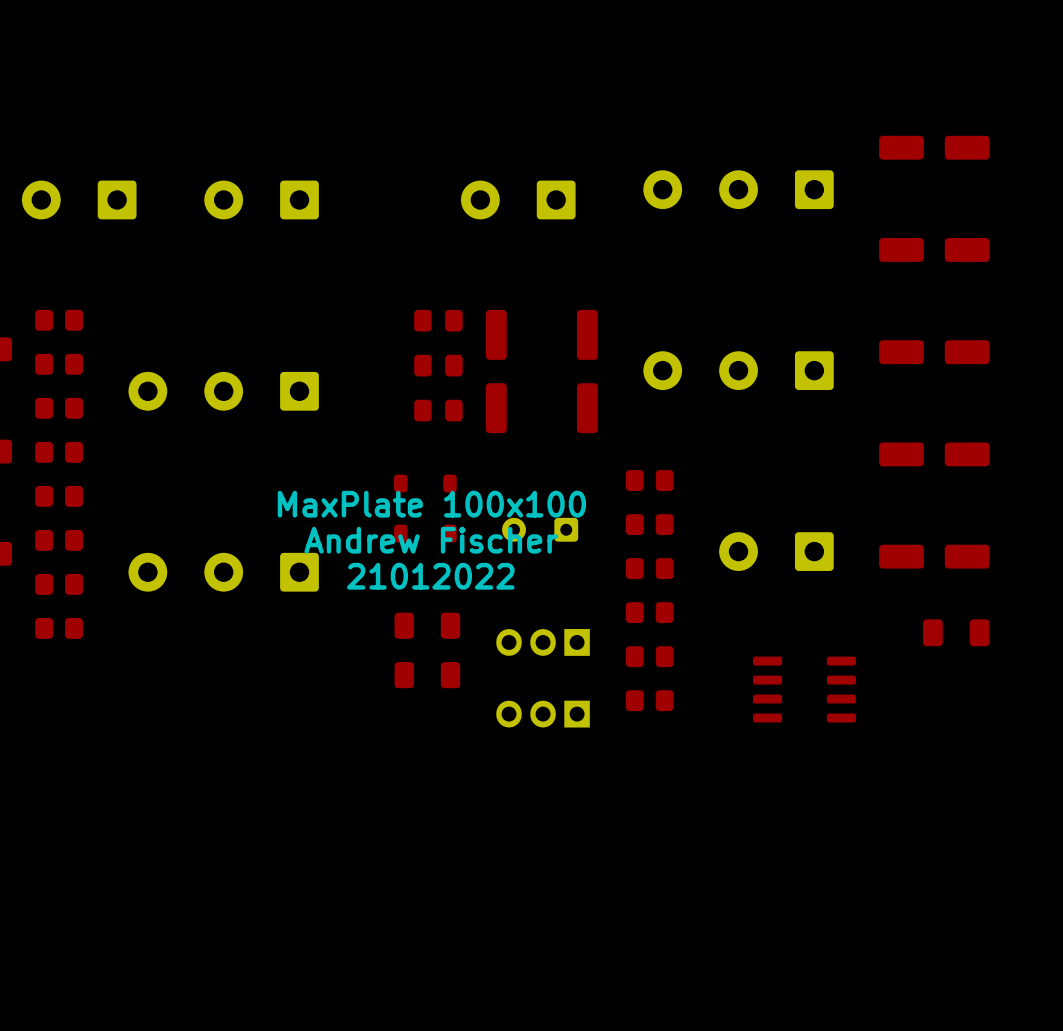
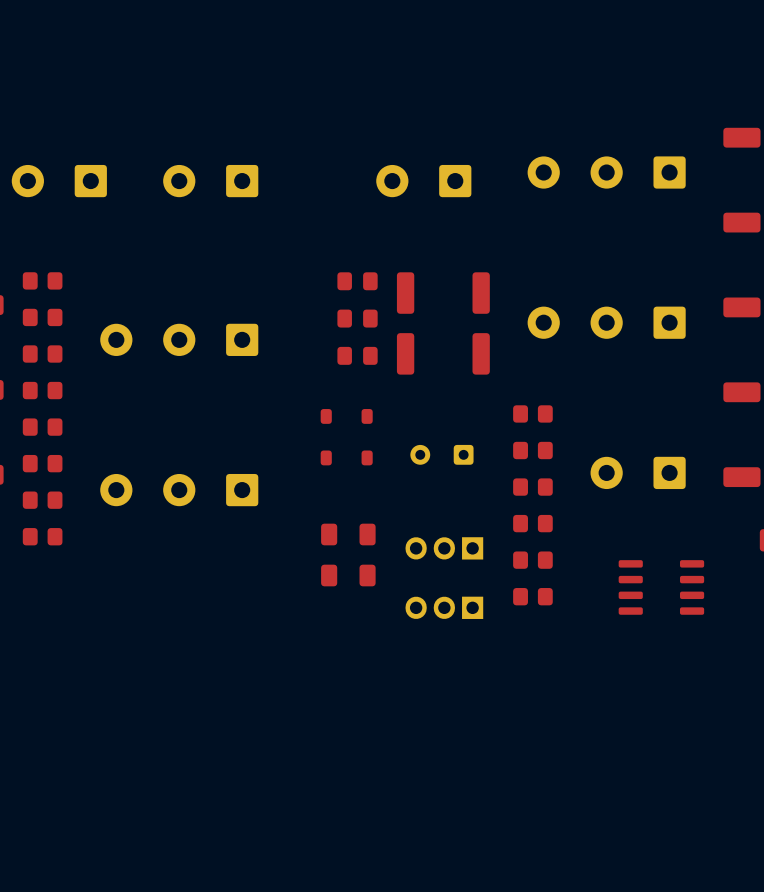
text: MaxPlate 100x100 (431, 504) -> none
text: Andrew Fischer (431, 540) -> none
text: 21012022 (430, 576) -> none

